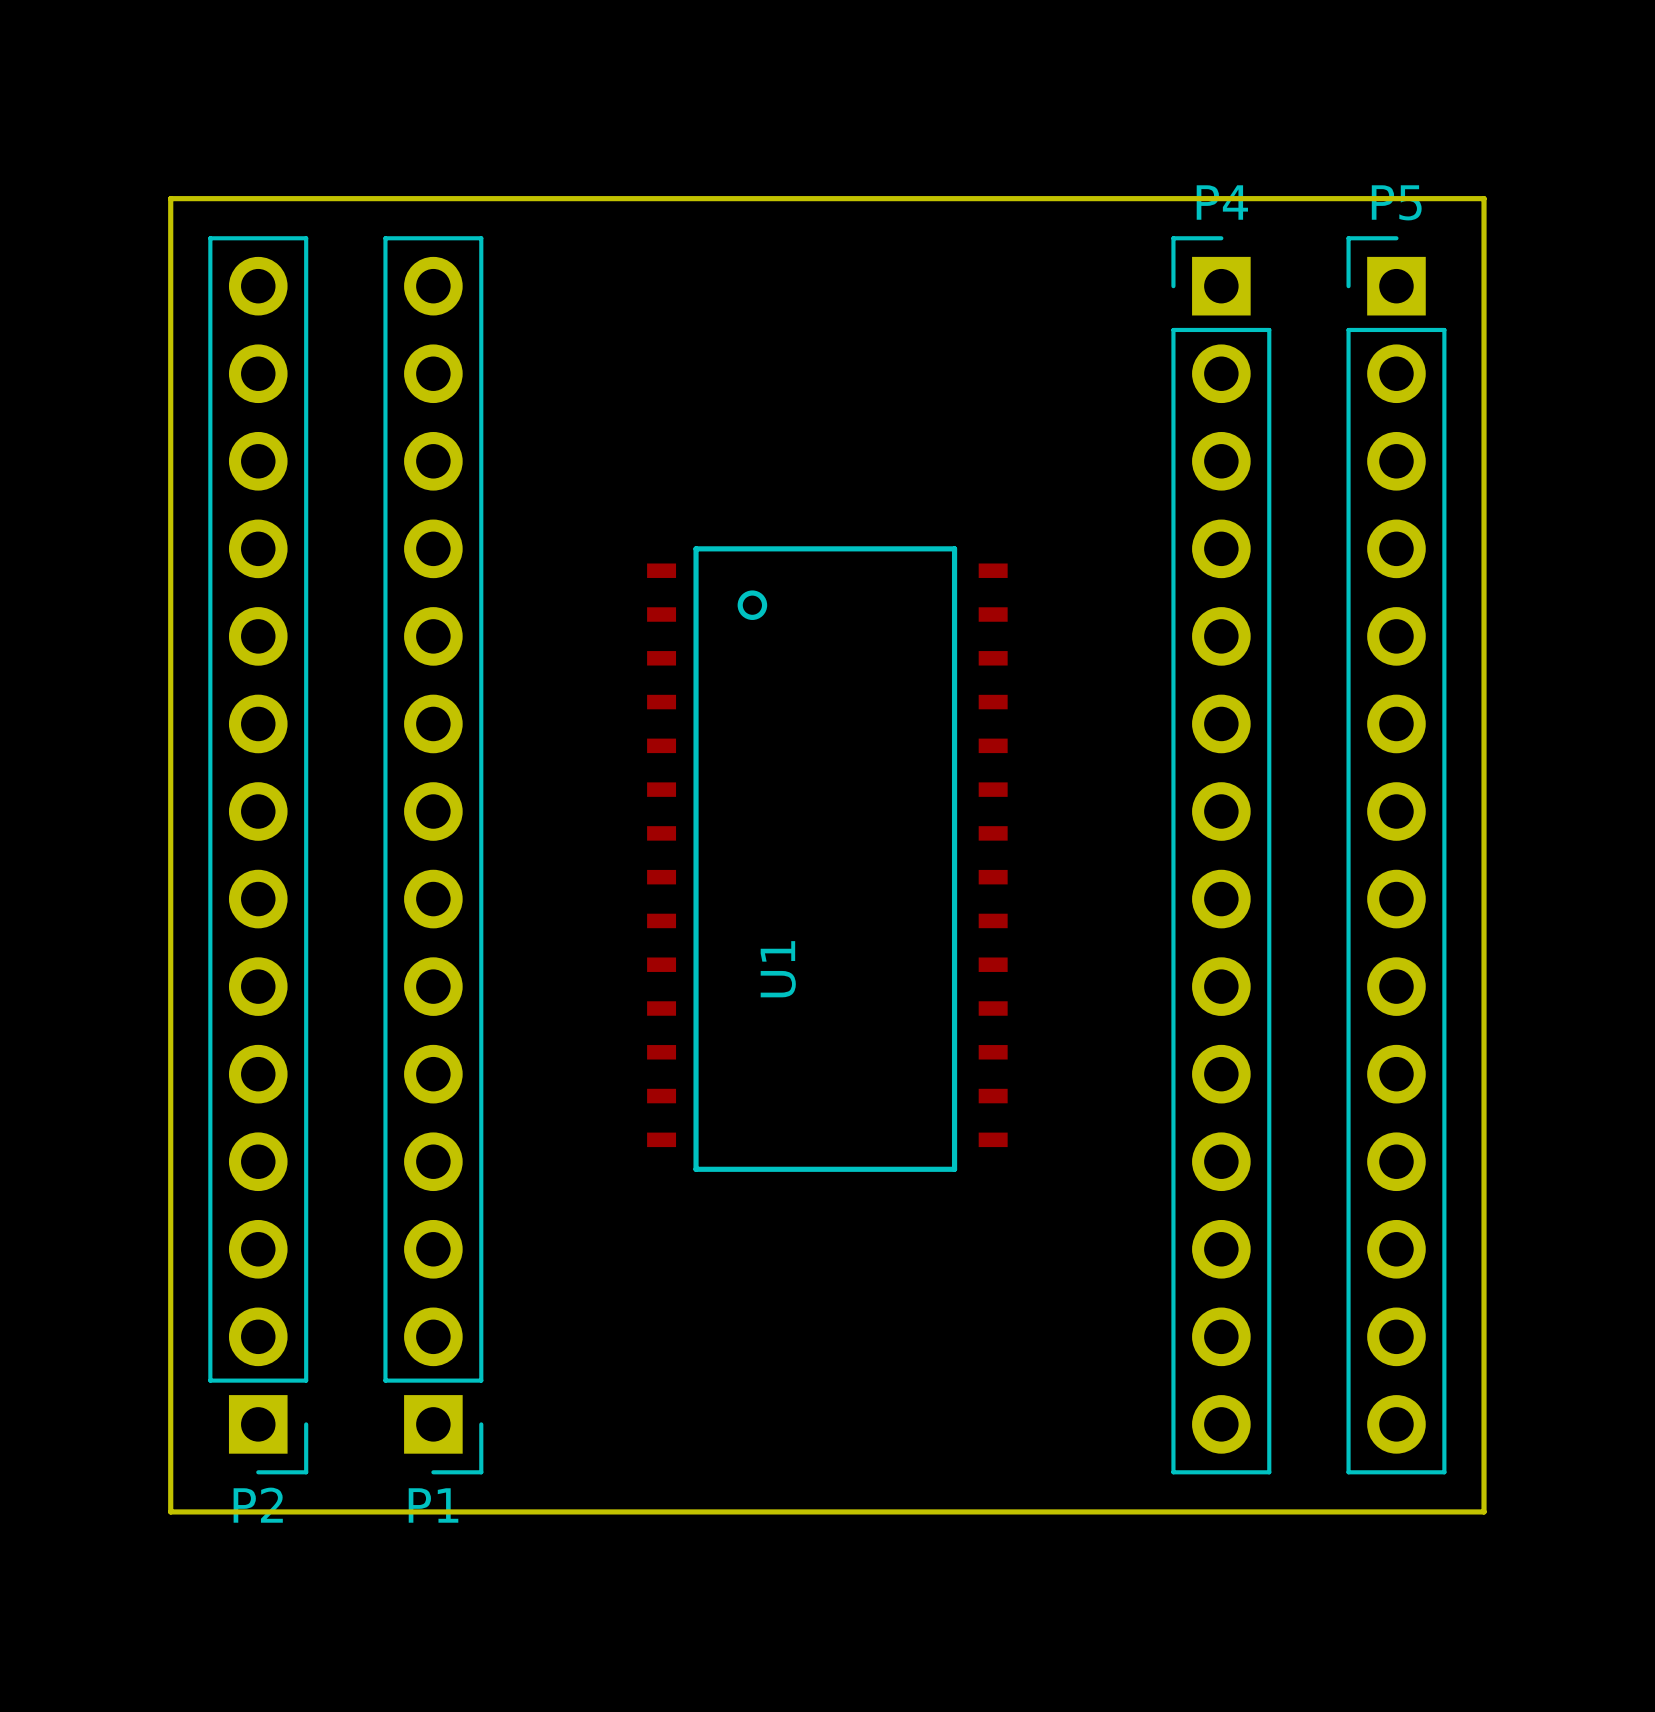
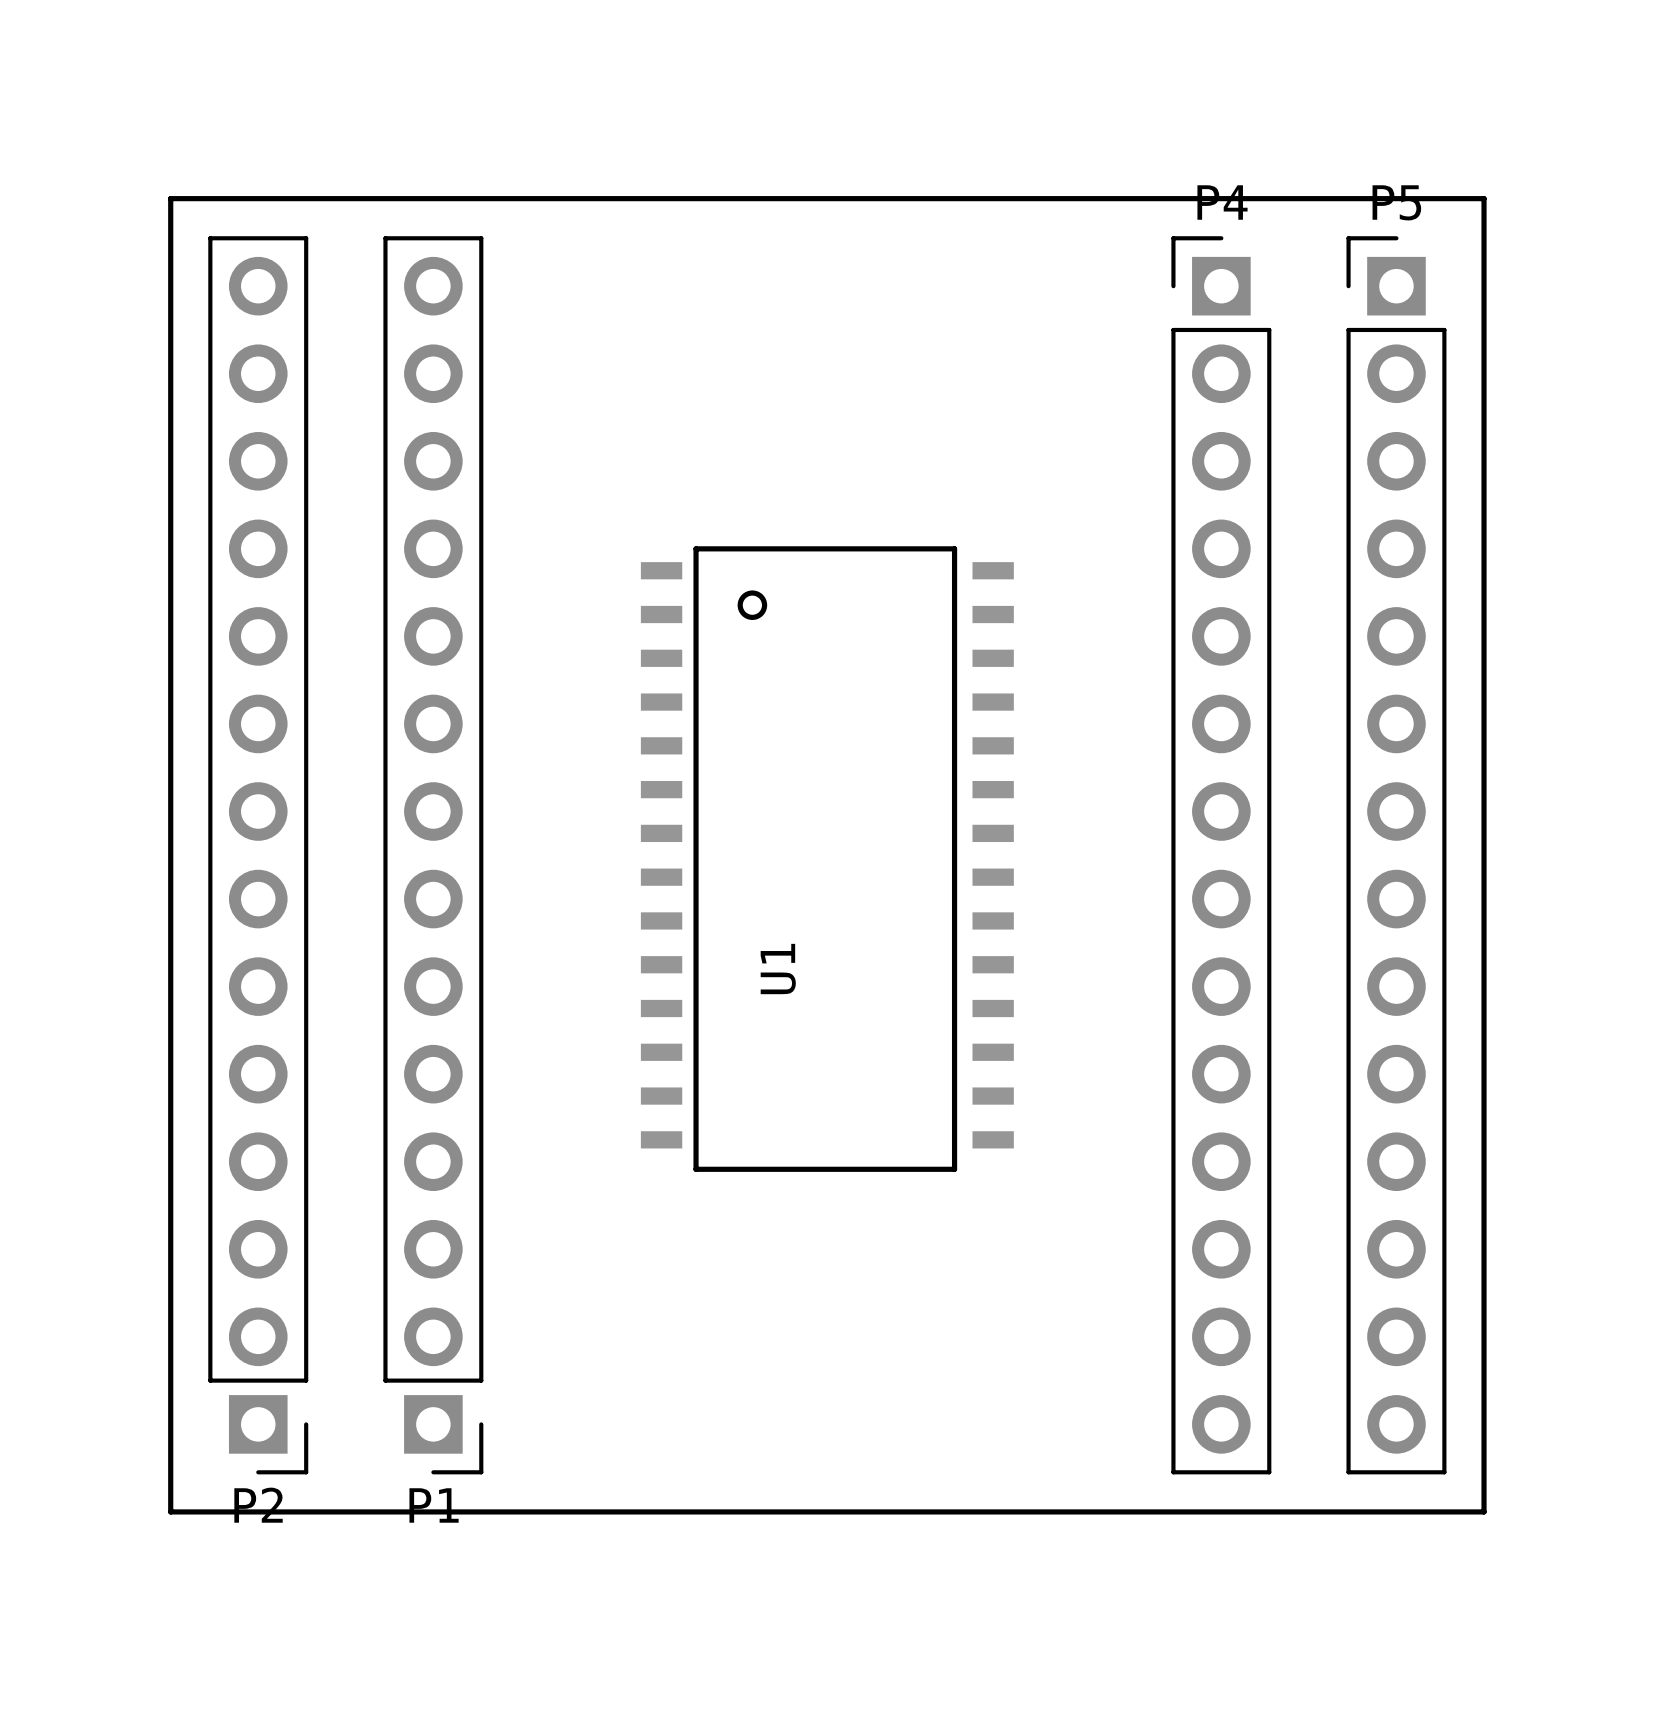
U1 footprint: [647, 546, 1008, 1172] -> [640, 546, 1014, 1172]

